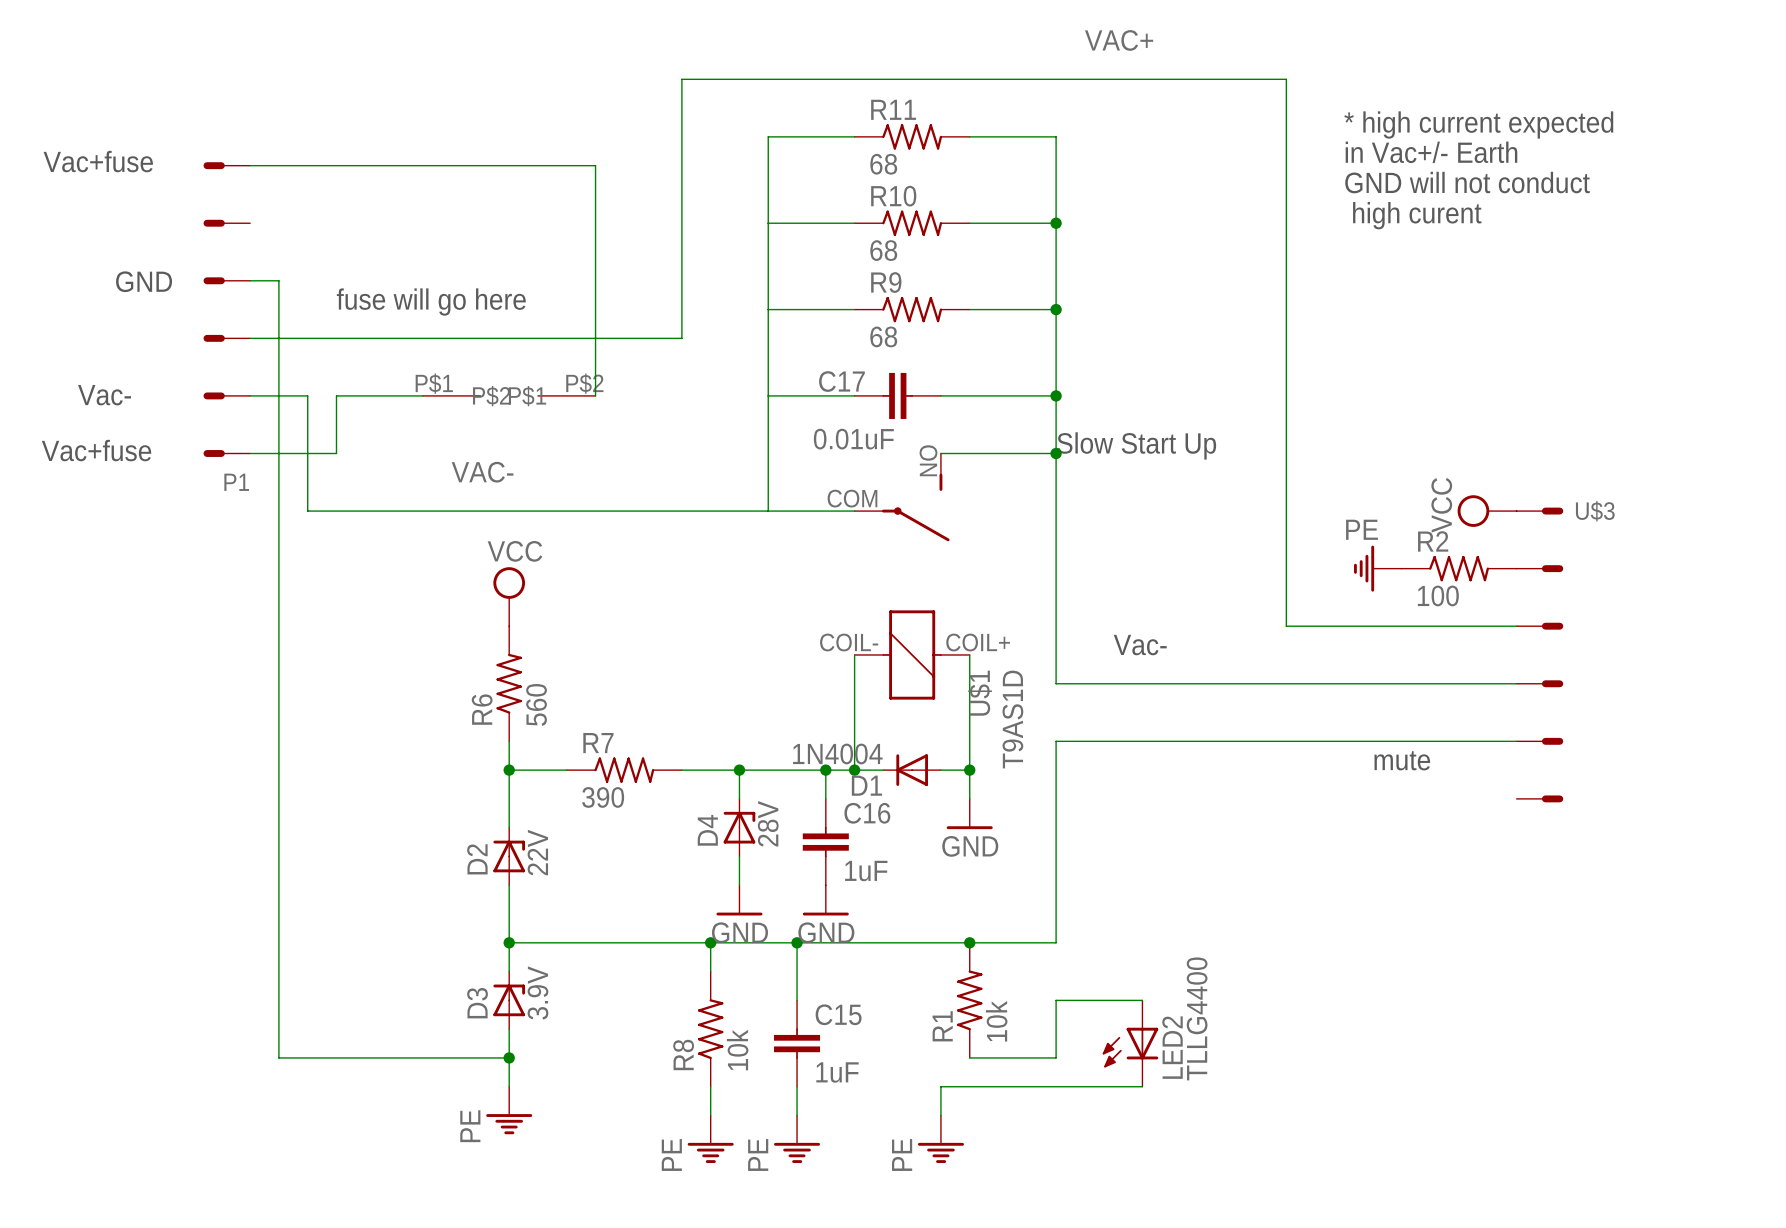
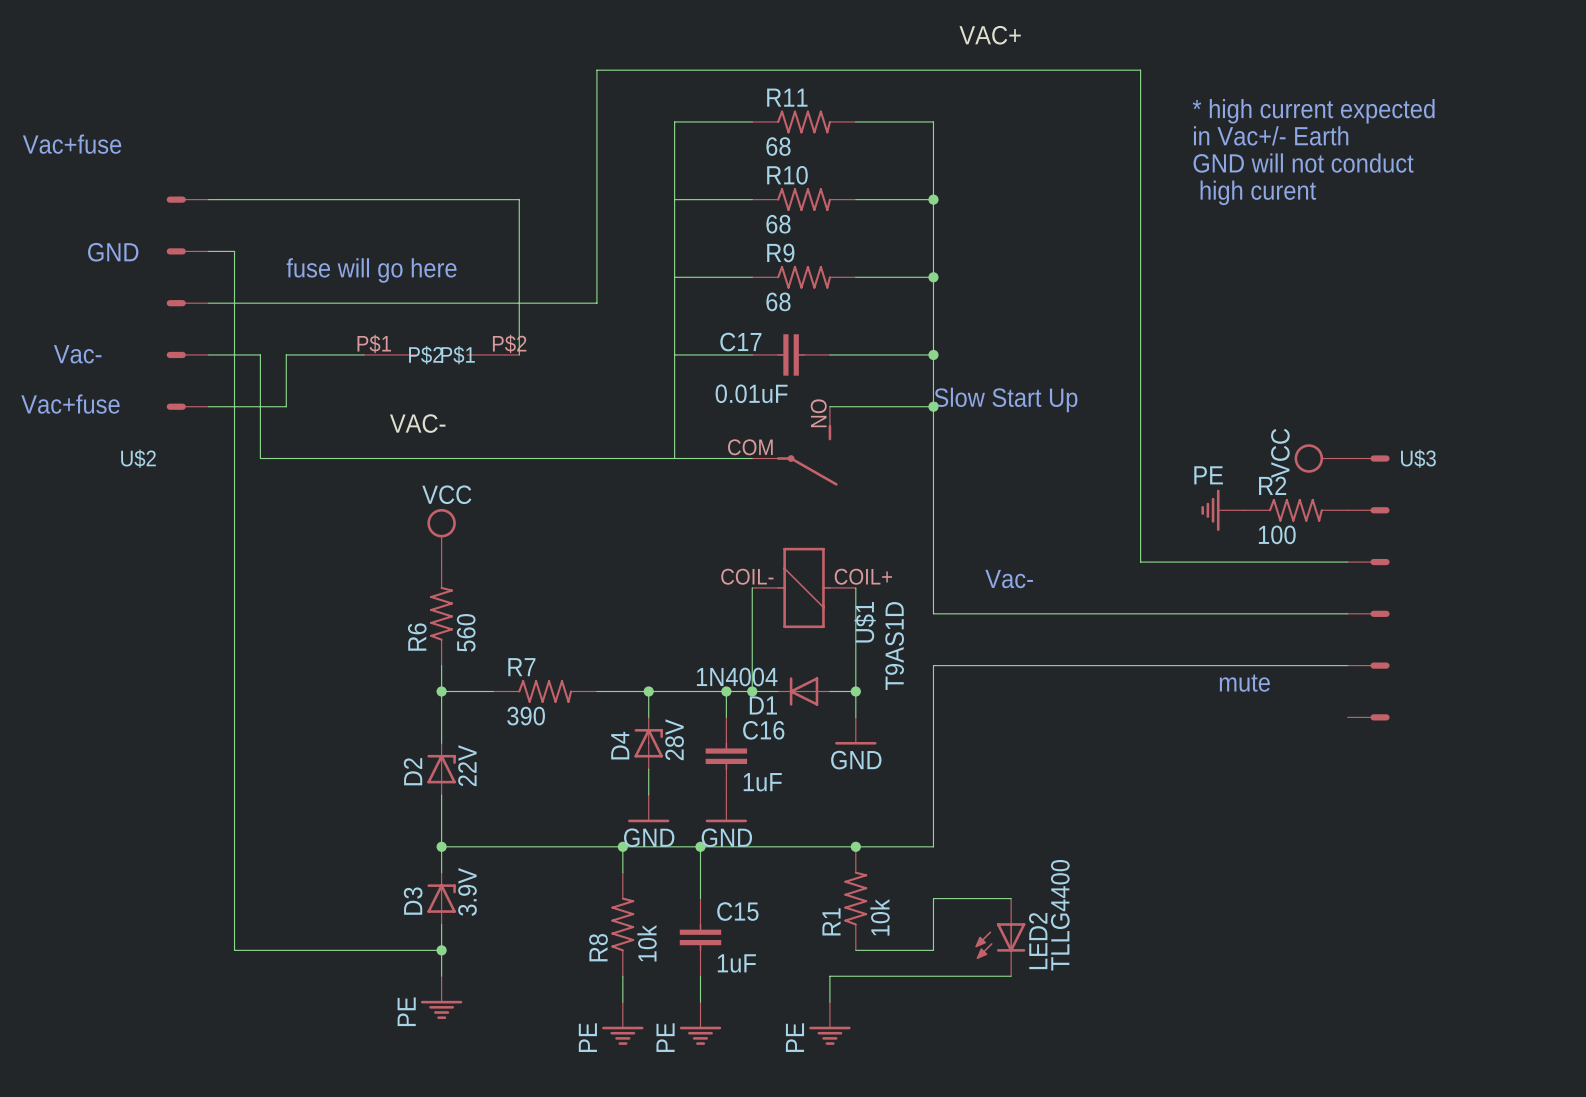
wire: (250, 165) (595, 165) (595, 223) -> (208, 199) (519, 199)
P1: (226, 309) -> none
U$2: none -> (187, 303)

